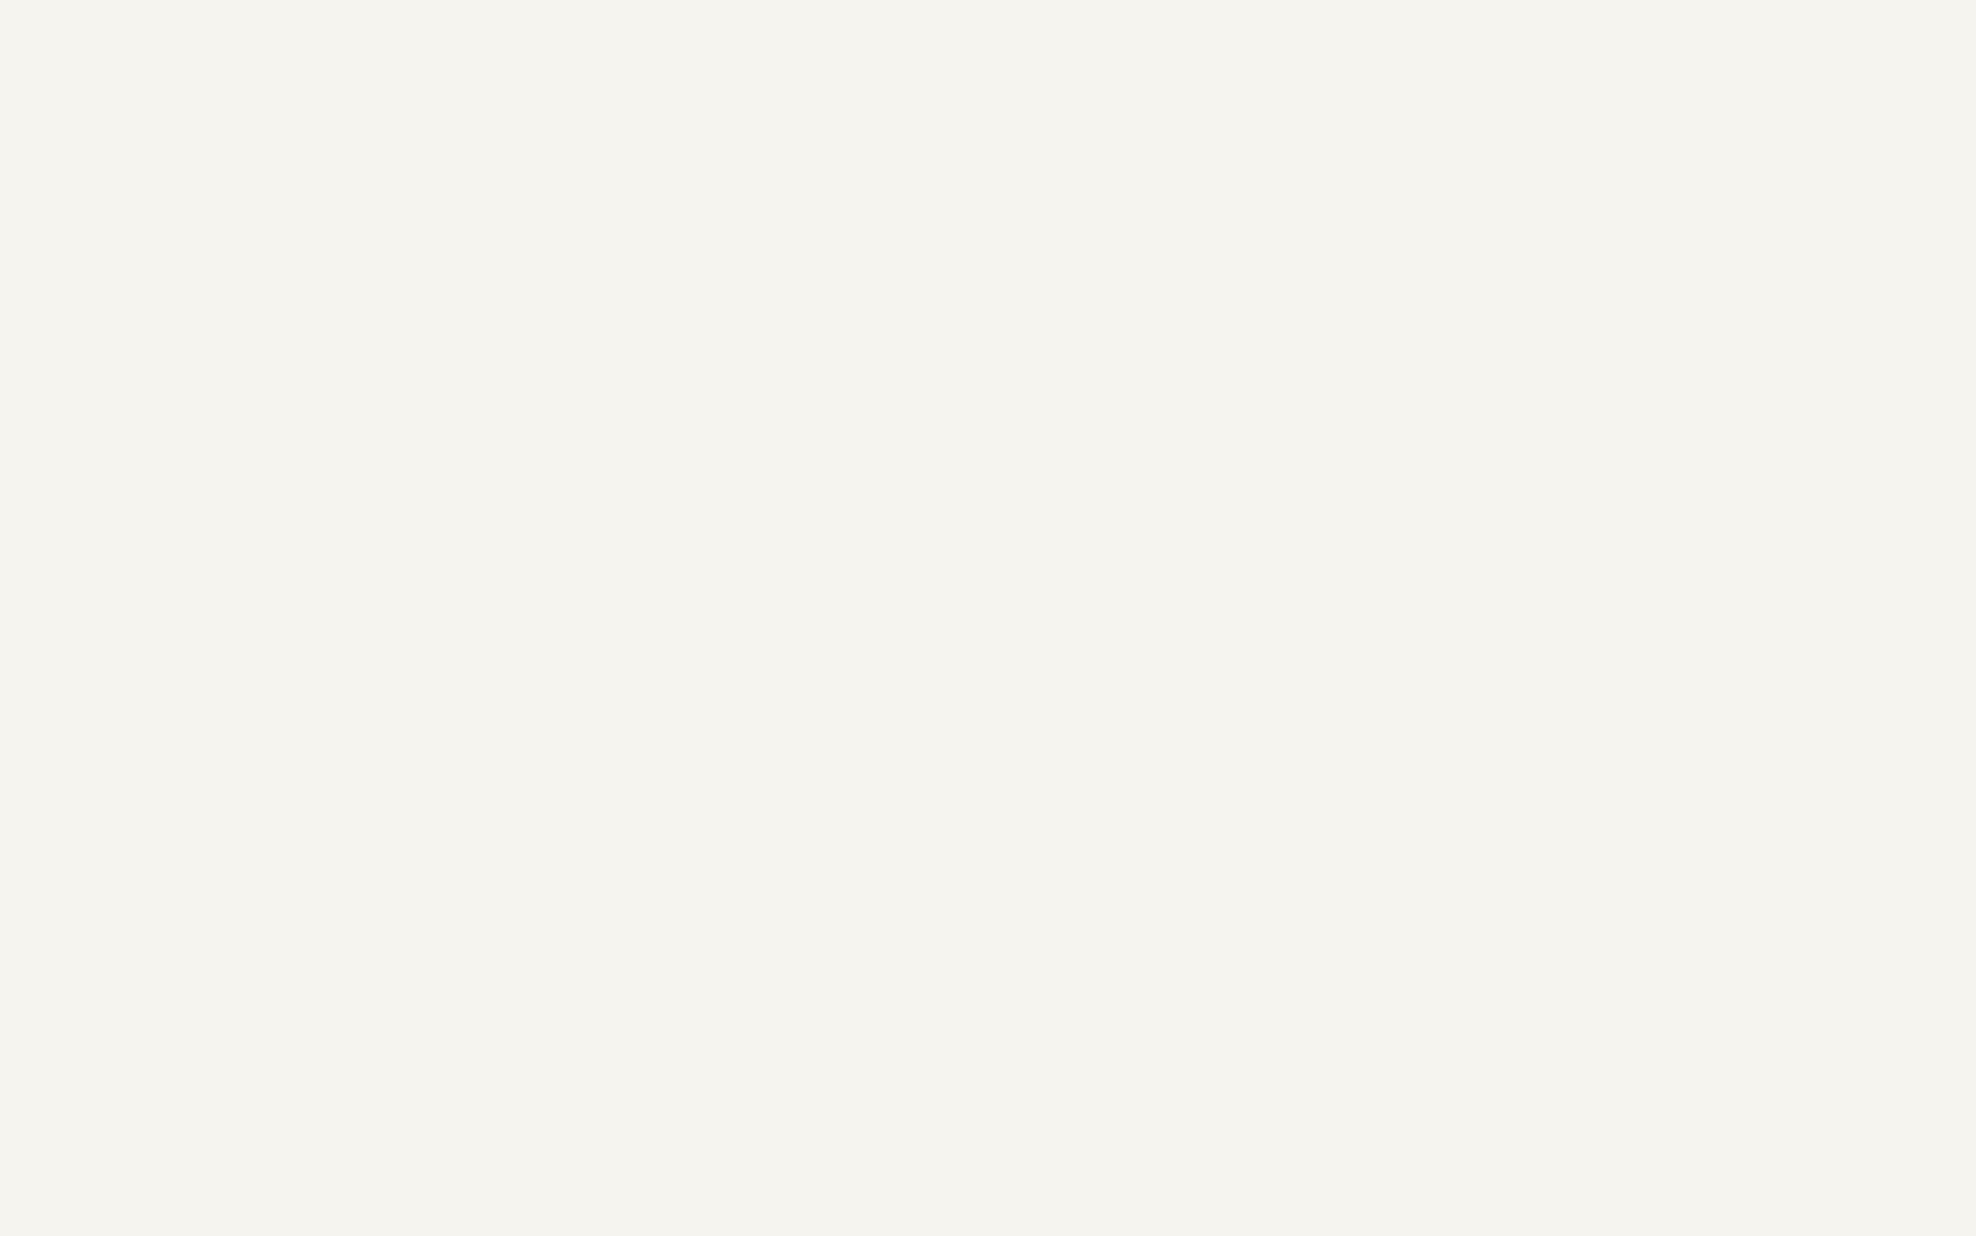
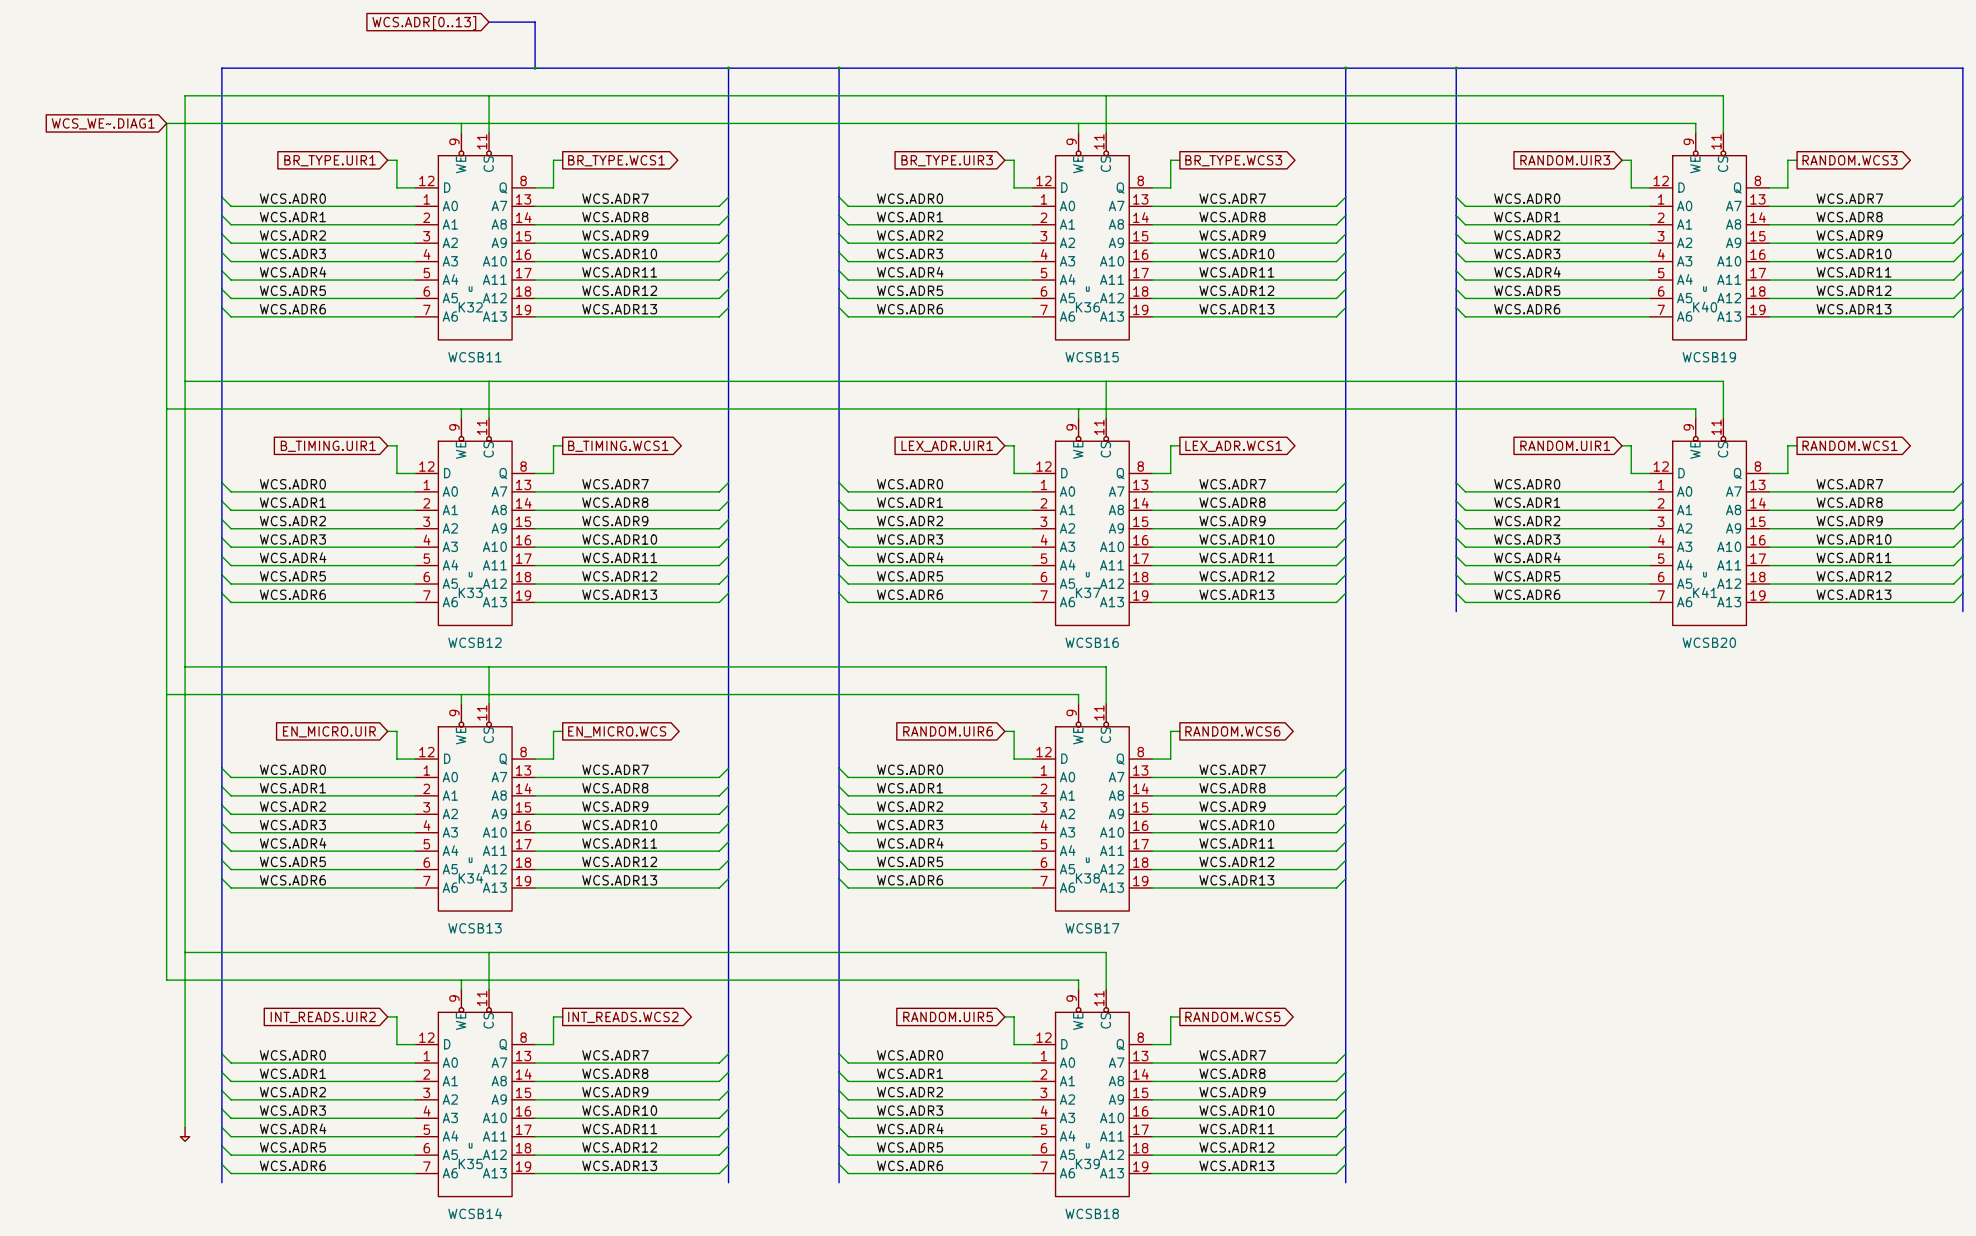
bus: none -> (489, 22) (535, 22) (535, 68)
global label: none -> WCS.ADR[0..13] (424, 23)
junction: none -> (535, 68)
bus: none -> (728, 68) (728, 1182)
junction: none -> (728, 68)
bus: none -> (839, 68) (839, 1182)
junction: none -> (839, 68)
bus: none -> (1345, 68) (1345, 1182)
junction: none -> (1345, 68)
bus: none -> (1456, 68) (1456, 611)
junction: none -> (1456, 68)
wire: none -> (489, 95) (489, 132)
wire: none -> (1106, 95) (1106, 132)
global label: none -> WCS_WE~.DIAG1 (103, 123)
wire: none -> (461, 123) (461, 132)
wire: none -> (1078, 123) (1078, 132)
wire: none -> (1695, 132) (1695, 123) (166, 123) (166, 980) (1078, 980) (1078, 989)
wire: none -> (1723, 132) (1723, 95) (185, 95) (185, 1127)
global label: none -> BR_TYPE.UIR1 (330, 160)
wire: none -> (387, 160) (396, 160) (396, 187) (415, 187)
wire: none -> (562, 160) (553, 160) (553, 187) (535, 187)
global label: none -> BR_TYPE.WCS1 (616, 160)
global label: none -> BR_TYPE.UIR3 (947, 160)
wire: none -> (1004, 160) (1014, 160) (1014, 187) (1032, 187)
wire: none -> (1179, 160) (1170, 160) (1170, 187) (1152, 187)
global label: none -> BR_TYPE.WCS3 (1233, 160)
global label: none -> RANDOM.UIR3 (1565, 160)
wire: none -> (1622, 160) (1631, 160) (1631, 187) (1649, 187)
wire: none -> (1797, 160) (1787, 160) (1787, 187) (1769, 187)
global label: none -> RANDOM.WCS3 (1850, 160)
wire: none -> (221, 197) (231, 206) (415, 206)
wire: none -> (728, 197) (719, 206) (535, 206)
wire: none -> (839, 197) (848, 206) (1032, 206)
wire: none -> (1345, 197) (1336, 206) (1152, 206)
wire: none -> (1456, 197) (1465, 206) (1649, 206)
wire: none -> (1962, 197) (1953, 206) (1769, 206)
label: none -> WCS.ADR0 (292, 198)
label: none -> WCS.ADR7 (615, 198)
label: none -> WCS.ADR0 (910, 198)
label: none -> WCS.ADR7 (1232, 198)
label: none -> WCS.ADR0 (1527, 198)
label: none -> WCS.ADR7 (1849, 198)
wire: none -> (221, 215) (231, 224) (415, 224)
wire: none -> (728, 215) (719, 224) (535, 224)
wire: none -> (839, 215) (848, 224) (1032, 224)
wire: none -> (1345, 215) (1336, 224) (1152, 224)
wire: none -> (1456, 215) (1465, 224) (1649, 224)
wire: none -> (1962, 215) (1953, 224) (1769, 224)
label: none -> WCS.ADR1 (292, 217)
label: none -> WCS.ADR8 (615, 217)
label: none -> WCS.ADR1 (910, 217)
label: none -> WCS.ADR8 (1232, 217)
label: none -> WCS.ADR1 (1527, 217)
label: none -> WCS.ADR8 (1849, 217)
wire: none -> (221, 233) (231, 243) (415, 243)
wire: none -> (728, 233) (719, 243) (535, 243)
wire: none -> (839, 233) (848, 243) (1032, 243)
wire: none -> (1345, 233) (1336, 243) (1152, 243)
wire: none -> (1456, 233) (1465, 243) (1649, 243)
wire: none -> (1962, 233) (1953, 243) (1769, 243)
label: none -> WCS.ADR2 (292, 235)
label: none -> WCS.ADR9 (615, 235)
label: none -> WCS.ADR2 (910, 235)
label: none -> WCS.ADR9 (1232, 235)
label: none -> WCS.ADR2 (1527, 235)
label: none -> WCS.ADR9 (1849, 235)
part: none -> (475, 236)
part: none -> (1092, 236)
part: none -> (1709, 236)
wire: none -> (221, 252) (231, 261) (415, 261)
wire: none -> (728, 252) (719, 261) (535, 261)
wire: none -> (839, 252) (848, 261) (1032, 261)
wire: none -> (1345, 252) (1336, 261) (1152, 261)
wire: none -> (1456, 252) (1465, 261) (1649, 261)
wire: none -> (1962, 252) (1953, 261) (1769, 261)
label: none -> WCS.ADR3 (292, 253)
label: none -> WCS.ADR10 (619, 253)
label: none -> WCS.ADR3 (910, 253)
label: none -> WCS.ADR10 (1236, 253)
label: none -> WCS.ADR3 (1527, 253)
label: none -> WCS.ADR10 (1854, 253)
wire: none -> (221, 270) (231, 280) (415, 280)
wire: none -> (728, 270) (719, 280) (535, 280)
wire: none -> (839, 270) (848, 280) (1032, 280)
wire: none -> (1345, 270) (1336, 280) (1152, 280)
wire: none -> (1456, 270) (1465, 280) (1649, 280)
wire: none -> (1962, 270) (1953, 280) (1769, 280)
label: none -> WCS.ADR4 (293, 272)
label: none -> WCS.ADR11 (619, 272)
label: none -> WCS.ADR4 (910, 272)
label: none -> WCS.ADR11 (1236, 272)
label: none -> WCS.ADR4 (1527, 272)
label: none -> WCS.ADR11 (1854, 272)
wire: none -> (221, 289) (231, 298) (415, 298)
wire: none -> (728, 289) (719, 298) (535, 298)
wire: none -> (839, 289) (848, 298) (1032, 298)
wire: none -> (1345, 289) (1336, 298) (1152, 298)
wire: none -> (1456, 289) (1465, 298) (1649, 298)
wire: none -> (1962, 289) (1953, 298) (1769, 298)
label: none -> WCS.ADR5 (292, 290)
label: none -> WCS.ADR12 (619, 290)
label: none -> WCS.ADR5 (910, 290)
label: none -> WCS.ADR12 (1236, 290)
label: none -> WCS.ADR5 (1527, 290)
label: none -> WCS.ADR12 (1854, 290)
wire: none -> (221, 307) (231, 316) (415, 316)
wire: none -> (728, 307) (719, 316) (535, 316)
wire: none -> (839, 307) (848, 316) (1032, 316)
wire: none -> (1345, 307) (1336, 316) (1152, 316)
wire: none -> (1456, 307) (1465, 316) (1649, 316)
wire: none -> (1962, 307) (1953, 316) (1769, 316)
label: none -> WCS.ADR6 (292, 309)
label: none -> WCS.ADR13 (619, 309)
label: none -> WCS.ADR6 (910, 309)
label: none -> WCS.ADR13 (1236, 309)
label: none -> WCS.ADR6 (1527, 309)
label: none -> WCS.ADR13 (1854, 309)
wire: none -> (185, 381) (1723, 381) (1723, 418)
wire: none -> (489, 381) (489, 418)
wire: none -> (1106, 381) (1106, 418)
wire: none -> (166, 408) (1695, 408) (1695, 418)
wire: none -> (461, 408) (461, 418)
wire: none -> (1078, 408) (1078, 418)
wire: none -> (387, 445) (396, 445) (396, 473) (415, 473)
wire: none -> (562, 445) (553, 445) (553, 473) (535, 473)
wire: none -> (1004, 445) (1014, 445) (1014, 473) (1032, 473)
wire: none -> (1179, 445) (1170, 445) (1170, 473) (1152, 473)
global label: none -> RANDOM.UIR1 (1565, 445)
wire: none -> (1622, 445) (1631, 445) (1631, 473) (1649, 473)
wire: none -> (1797, 445) (1787, 445) (1787, 473) (1769, 473)
global label: none -> RANDOM.WCS1 (1850, 445)
global label: none -> B_TIMING.UIR1 (328, 446)
global label: none -> B_TIMING.WCS1 (618, 446)
global label: none -> LEX_ADR.UIR1 (947, 446)
global label: none -> LEX_ADR.WCS1 (1233, 446)
wire: none -> (221, 482) (231, 491) (415, 491)
wire: none -> (728, 482) (719, 491) (535, 491)
wire: none -> (839, 482) (848, 491) (1032, 491)
wire: none -> (1345, 482) (1336, 491) (1152, 491)
wire: none -> (1456, 482) (1465, 491) (1649, 491)
wire: none -> (1962, 482) (1953, 491) (1769, 491)
label: none -> WCS.ADR0 (292, 484)
label: none -> WCS.ADR7 (615, 484)
label: none -> WCS.ADR0 (910, 484)
label: none -> WCS.ADR7 (1232, 484)
label: none -> WCS.ADR0 (1527, 484)
label: none -> WCS.ADR7 (1849, 484)
wire: none -> (221, 501) (231, 510) (415, 510)
wire: none -> (728, 501) (719, 510) (535, 510)
wire: none -> (839, 501) (848, 510) (1032, 510)
wire: none -> (1345, 501) (1336, 510) (1152, 510)
wire: none -> (1456, 501) (1465, 510) (1649, 510)
wire: none -> (1962, 501) (1953, 510) (1769, 510)
label: none -> WCS.ADR1 (292, 502)
label: none -> WCS.ADR8 (615, 502)
label: none -> WCS.ADR1 (910, 502)
label: none -> WCS.ADR8 (1232, 502)
label: none -> WCS.ADR1 (1527, 502)
label: none -> WCS.ADR8 (1849, 502)
wire: none -> (221, 519) (231, 528) (415, 528)
wire: none -> (728, 519) (719, 528) (535, 528)
wire: none -> (839, 519) (848, 528) (1032, 528)
wire: none -> (1345, 519) (1336, 528) (1152, 528)
wire: none -> (1456, 519) (1465, 528) (1649, 528)
wire: none -> (1962, 519) (1953, 528) (1769, 528)
label: none -> WCS.ADR2 (292, 521)
part: none -> (475, 521)
label: none -> WCS.ADR9 (615, 521)
label: none -> WCS.ADR2 (910, 521)
part: none -> (1092, 521)
label: none -> WCS.ADR9 (1232, 521)
label: none -> WCS.ADR2 (1527, 521)
part: none -> (1709, 521)
label: none -> WCS.ADR9 (1849, 521)
wire: none -> (221, 537) (231, 547) (415, 547)
wire: none -> (728, 537) (719, 547) (535, 547)
wire: none -> (839, 537) (848, 547) (1032, 547)
wire: none -> (1345, 537) (1336, 547) (1152, 547)
wire: none -> (1456, 537) (1465, 547) (1649, 547)
wire: none -> (1962, 537) (1953, 547) (1769, 547)
label: none -> WCS.ADR3 (292, 539)
label: none -> WCS.ADR10 (619, 539)
label: none -> WCS.ADR3 (910, 539)
label: none -> WCS.ADR10 (1236, 539)
label: none -> WCS.ADR3 (1527, 539)
label: none -> WCS.ADR10 (1854, 539)
wire: none -> (221, 556) (231, 565) (415, 565)
wire: none -> (728, 556) (719, 565) (535, 565)
wire: none -> (839, 556) (848, 565) (1032, 565)
wire: none -> (1345, 556) (1336, 565) (1152, 565)
wire: none -> (1456, 556) (1465, 565) (1649, 565)
wire: none -> (1962, 556) (1953, 565) (1769, 565)
label: none -> WCS.ADR4 (293, 557)
label: none -> WCS.ADR11 (619, 557)
label: none -> WCS.ADR4 (910, 557)
label: none -> WCS.ADR11 (1236, 557)
label: none -> WCS.ADR4 (1527, 557)
label: none -> WCS.ADR11 (1854, 557)
wire: none -> (221, 574) (231, 584) (415, 584)
wire: none -> (728, 574) (719, 584) (535, 584)
wire: none -> (839, 574) (848, 584) (1032, 584)
wire: none -> (1345, 574) (1336, 584) (1152, 584)
wire: none -> (1456, 574) (1465, 584) (1649, 584)
wire: none -> (1962, 574) (1953, 584) (1769, 584)
label: none -> WCS.ADR5 (292, 576)
label: none -> WCS.ADR12 (619, 576)
label: none -> WCS.ADR5 (910, 576)
label: none -> WCS.ADR12 (1236, 576)
label: none -> WCS.ADR5 (1527, 576)
label: none -> WCS.ADR12 (1854, 576)
wire: none -> (221, 593) (231, 602) (415, 602)
wire: none -> (728, 593) (719, 602) (535, 602)
wire: none -> (839, 593) (848, 602) (1032, 602)
wire: none -> (1345, 593) (1336, 602) (1152, 602)
wire: none -> (1456, 593) (1465, 602) (1649, 602)
wire: none -> (1962, 593) (1953, 602) (1769, 602)
label: none -> WCS.ADR6 (292, 594)
label: none -> WCS.ADR13 (619, 594)
label: none -> WCS.ADR6 (910, 594)
label: none -> WCS.ADR13 (1236, 594)
label: none -> WCS.ADR6 (1527, 594)
label: none -> WCS.ADR13 (1854, 594)
bus: none -> (1962, 611) (1962, 68) (221, 68) (221, 1182)
wire: none -> (185, 666) (1106, 666) (1106, 703)
wire: none -> (489, 666) (489, 703)
wire: none -> (166, 694) (1078, 694) (1078, 703)
wire: none -> (461, 694) (461, 703)
global label: none -> EN_MICRO.UIR (329, 731)
wire: none -> (387, 731) (396, 731) (396, 759) (415, 759)
wire: none -> (562, 731) (553, 731) (553, 759) (535, 759)
global label: none -> EN_MICRO.WCS (617, 731)
global label: none -> RANDOM.UIR6 (948, 731)
wire: none -> (1004, 731) (1014, 731) (1014, 759) (1032, 759)
wire: none -> (1179, 731) (1170, 731) (1170, 759) (1152, 759)
global label: none -> RANDOM.WCS6 (1232, 731)
wire: none -> (221, 768) (231, 777) (415, 777)
wire: none -> (728, 768) (719, 777) (535, 777)
wire: none -> (839, 768) (848, 777) (1032, 777)
wire: none -> (1345, 768) (1336, 777) (1152, 777)
label: none -> WCS.ADR0 (292, 769)
label: none -> WCS.ADR7 (615, 769)
label: none -> WCS.ADR0 (910, 769)
label: none -> WCS.ADR7 (1232, 769)
wire: none -> (221, 786) (231, 795) (415, 795)
wire: none -> (728, 786) (719, 795) (535, 795)
wire: none -> (839, 786) (848, 795) (1032, 795)
wire: none -> (1345, 786) (1336, 795) (1152, 795)
label: none -> WCS.ADR1 (292, 788)
label: none -> WCS.ADR8 (615, 788)
label: none -> WCS.ADR1 (910, 788)
label: none -> WCS.ADR8 (1232, 788)
wire: none -> (221, 805) (231, 814) (415, 814)
wire: none -> (728, 805) (719, 814) (535, 814)
wire: none -> (839, 805) (848, 814) (1032, 814)
wire: none -> (1345, 805) (1336, 814) (1152, 814)
label: none -> WCS.ADR2 (292, 806)
label: none -> WCS.ADR9 (615, 806)
label: none -> WCS.ADR2 (910, 806)
label: none -> WCS.ADR9 (1232, 806)
part: none -> (475, 807)
part: none -> (1092, 807)
wire: none -> (221, 823) (231, 832) (415, 832)
wire: none -> (728, 823) (719, 832) (535, 832)
wire: none -> (839, 823) (848, 832) (1032, 832)
wire: none -> (1345, 823) (1336, 832) (1152, 832)
label: none -> WCS.ADR3 (292, 825)
label: none -> WCS.ADR10 (619, 825)
label: none -> WCS.ADR3 (910, 825)
label: none -> WCS.ADR10 (1236, 825)
wire: none -> (221, 841) (231, 851) (415, 851)
wire: none -> (728, 841) (719, 851) (535, 851)
wire: none -> (839, 841) (848, 851) (1032, 851)
wire: none -> (1345, 841) (1336, 851) (1152, 851)
label: none -> WCS.ADR4 (293, 843)
label: none -> WCS.ADR11 (619, 843)
label: none -> WCS.ADR4 (910, 843)
label: none -> WCS.ADR11 (1236, 843)
wire: none -> (221, 860) (231, 869) (415, 869)
wire: none -> (728, 860) (719, 869) (535, 869)
wire: none -> (839, 860) (848, 869) (1032, 869)
wire: none -> (1345, 860) (1336, 869) (1152, 869)
label: none -> WCS.ADR5 (292, 861)
label: none -> WCS.ADR12 (619, 861)
label: none -> WCS.ADR5 (910, 861)
label: none -> WCS.ADR12 (1236, 861)
wire: none -> (221, 878) (231, 887) (415, 887)
wire: none -> (728, 878) (719, 887) (535, 887)
wire: none -> (839, 878) (848, 887) (1032, 887)
wire: none -> (1345, 878) (1336, 887) (1152, 887)
label: none -> WCS.ADR6 (292, 880)
label: none -> WCS.ADR13 (619, 880)
label: none -> WCS.ADR6 (910, 880)
label: none -> WCS.ADR13 (1236, 880)
wire: none -> (185, 952) (1106, 952) (1106, 989)
wire: none -> (489, 952) (489, 989)
wire: none -> (461, 980) (461, 989)
wire: none -> (387, 1016) (396, 1016) (396, 1044) (415, 1044)
wire: none -> (562, 1016) (553, 1016) (553, 1044) (535, 1044)
global label: none -> RANDOM.UIR5 (948, 1016)
wire: none -> (1004, 1016) (1014, 1016) (1014, 1044) (1032, 1044)
wire: none -> (1179, 1016) (1170, 1016) (1170, 1044) (1152, 1044)
global label: none -> RANDOM.WCS5 (1232, 1016)
global label: none -> INT_READS.UIR2 (323, 1017)
global label: none -> INT_READS.WCS2 (623, 1017)
wire: none -> (221, 1053) (231, 1063) (415, 1063)
wire: none -> (728, 1053) (719, 1063) (535, 1063)
wire: none -> (839, 1053) (848, 1063) (1032, 1063)
wire: none -> (1345, 1053) (1336, 1063) (1152, 1063)
label: none -> WCS.ADR0 (292, 1055)
label: none -> WCS.ADR7 (615, 1055)
label: none -> WCS.ADR0 (910, 1055)
label: none -> WCS.ADR7 (1232, 1055)
wire: none -> (221, 1072) (231, 1081) (415, 1081)
wire: none -> (728, 1072) (719, 1081) (535, 1081)
wire: none -> (839, 1072) (848, 1081) (1032, 1081)
wire: none -> (1345, 1072) (1336, 1081) (1152, 1081)
label: none -> WCS.ADR1 (292, 1073)
label: none -> WCS.ADR8 (615, 1073)
label: none -> WCS.ADR1 (910, 1073)
label: none -> WCS.ADR8 (1232, 1073)
wire: none -> (221, 1090) (231, 1099) (415, 1099)
wire: none -> (728, 1090) (719, 1099) (535, 1099)
wire: none -> (839, 1090) (848, 1099) (1032, 1099)
wire: none -> (1345, 1090) (1336, 1099) (1152, 1099)
label: none -> WCS.ADR2 (292, 1092)
part: none -> (475, 1092)
label: none -> WCS.ADR9 (615, 1092)
label: none -> WCS.ADR2 (910, 1092)
part: none -> (1092, 1092)
label: none -> WCS.ADR9 (1232, 1092)
wire: none -> (221, 1109) (231, 1118) (415, 1118)
wire: none -> (728, 1109) (719, 1118) (535, 1118)
wire: none -> (839, 1109) (848, 1118) (1032, 1118)
wire: none -> (1345, 1109) (1336, 1118) (1152, 1118)
label: none -> WCS.ADR3 (292, 1110)
label: none -> WCS.ADR10 (619, 1110)
label: none -> WCS.ADR3 (910, 1110)
label: none -> WCS.ADR10 (1236, 1110)
wire: none -> (221, 1127) (231, 1136) (415, 1136)
wire: none -> (728, 1127) (719, 1136) (535, 1136)
wire: none -> (839, 1127) (848, 1136) (1032, 1136)
wire: none -> (1345, 1127) (1336, 1136) (1152, 1136)
label: none -> WCS.ADR4 (293, 1128)
label: none -> WCS.ADR4 (910, 1128)
label: none -> WCS.ADR11 (619, 1129)
label: none -> WCS.ADR11 (1236, 1129)
power symbol: none -> (185, 1134)
wire: none -> (221, 1145) (231, 1155) (415, 1155)
wire: none -> (728, 1145) (719, 1155) (535, 1155)
wire: none -> (839, 1145) (848, 1155) (1032, 1155)
wire: none -> (1345, 1145) (1336, 1155) (1152, 1155)
label: none -> WCS.ADR5 (292, 1147)
label: none -> WCS.ADR12 (619, 1147)
label: none -> WCS.ADR5 (910, 1147)
label: none -> WCS.ADR12 (1236, 1147)
wire: none -> (221, 1164) (231, 1173) (415, 1173)
wire: none -> (728, 1164) (719, 1173) (535, 1173)
wire: none -> (839, 1164) (848, 1173) (1032, 1173)
wire: none -> (1345, 1164) (1336, 1173) (1152, 1173)
label: none -> WCS.ADR6 (292, 1165)
label: none -> WCS.ADR13 (619, 1165)
label: none -> WCS.ADR6 (910, 1165)
label: none -> WCS.ADR13 (1236, 1165)

